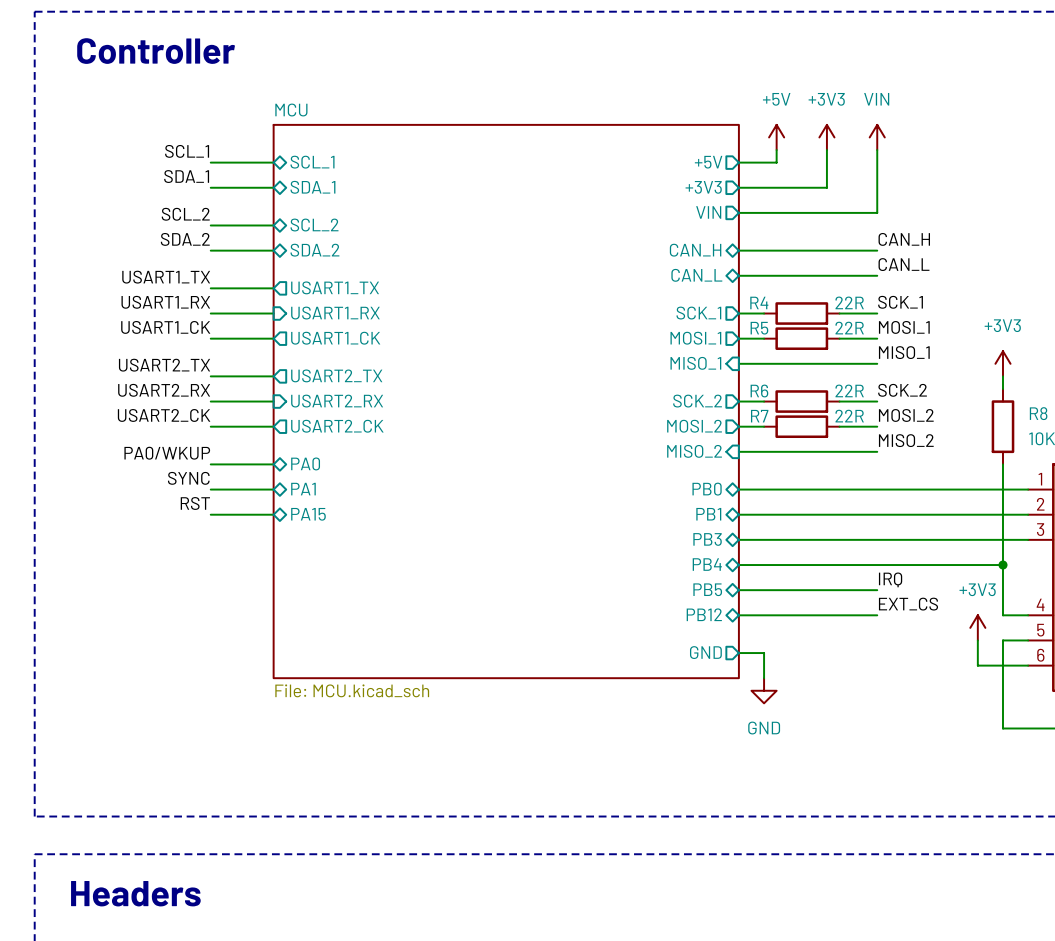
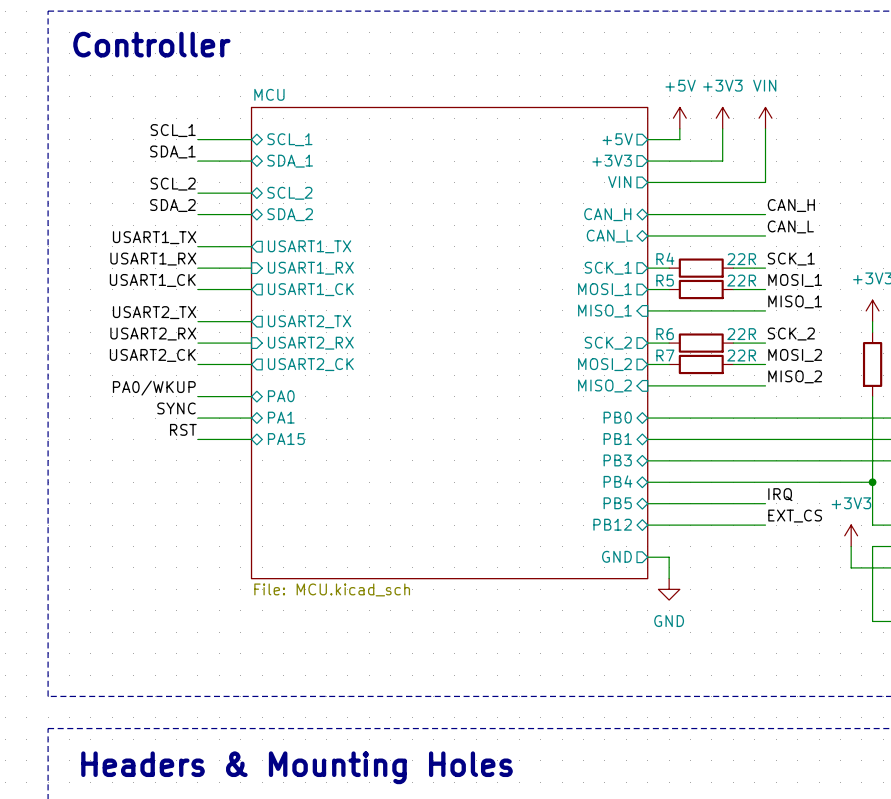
text: Headers (135, 893) -> none
text: none -> Headers & Mounting Holes (297, 767)

